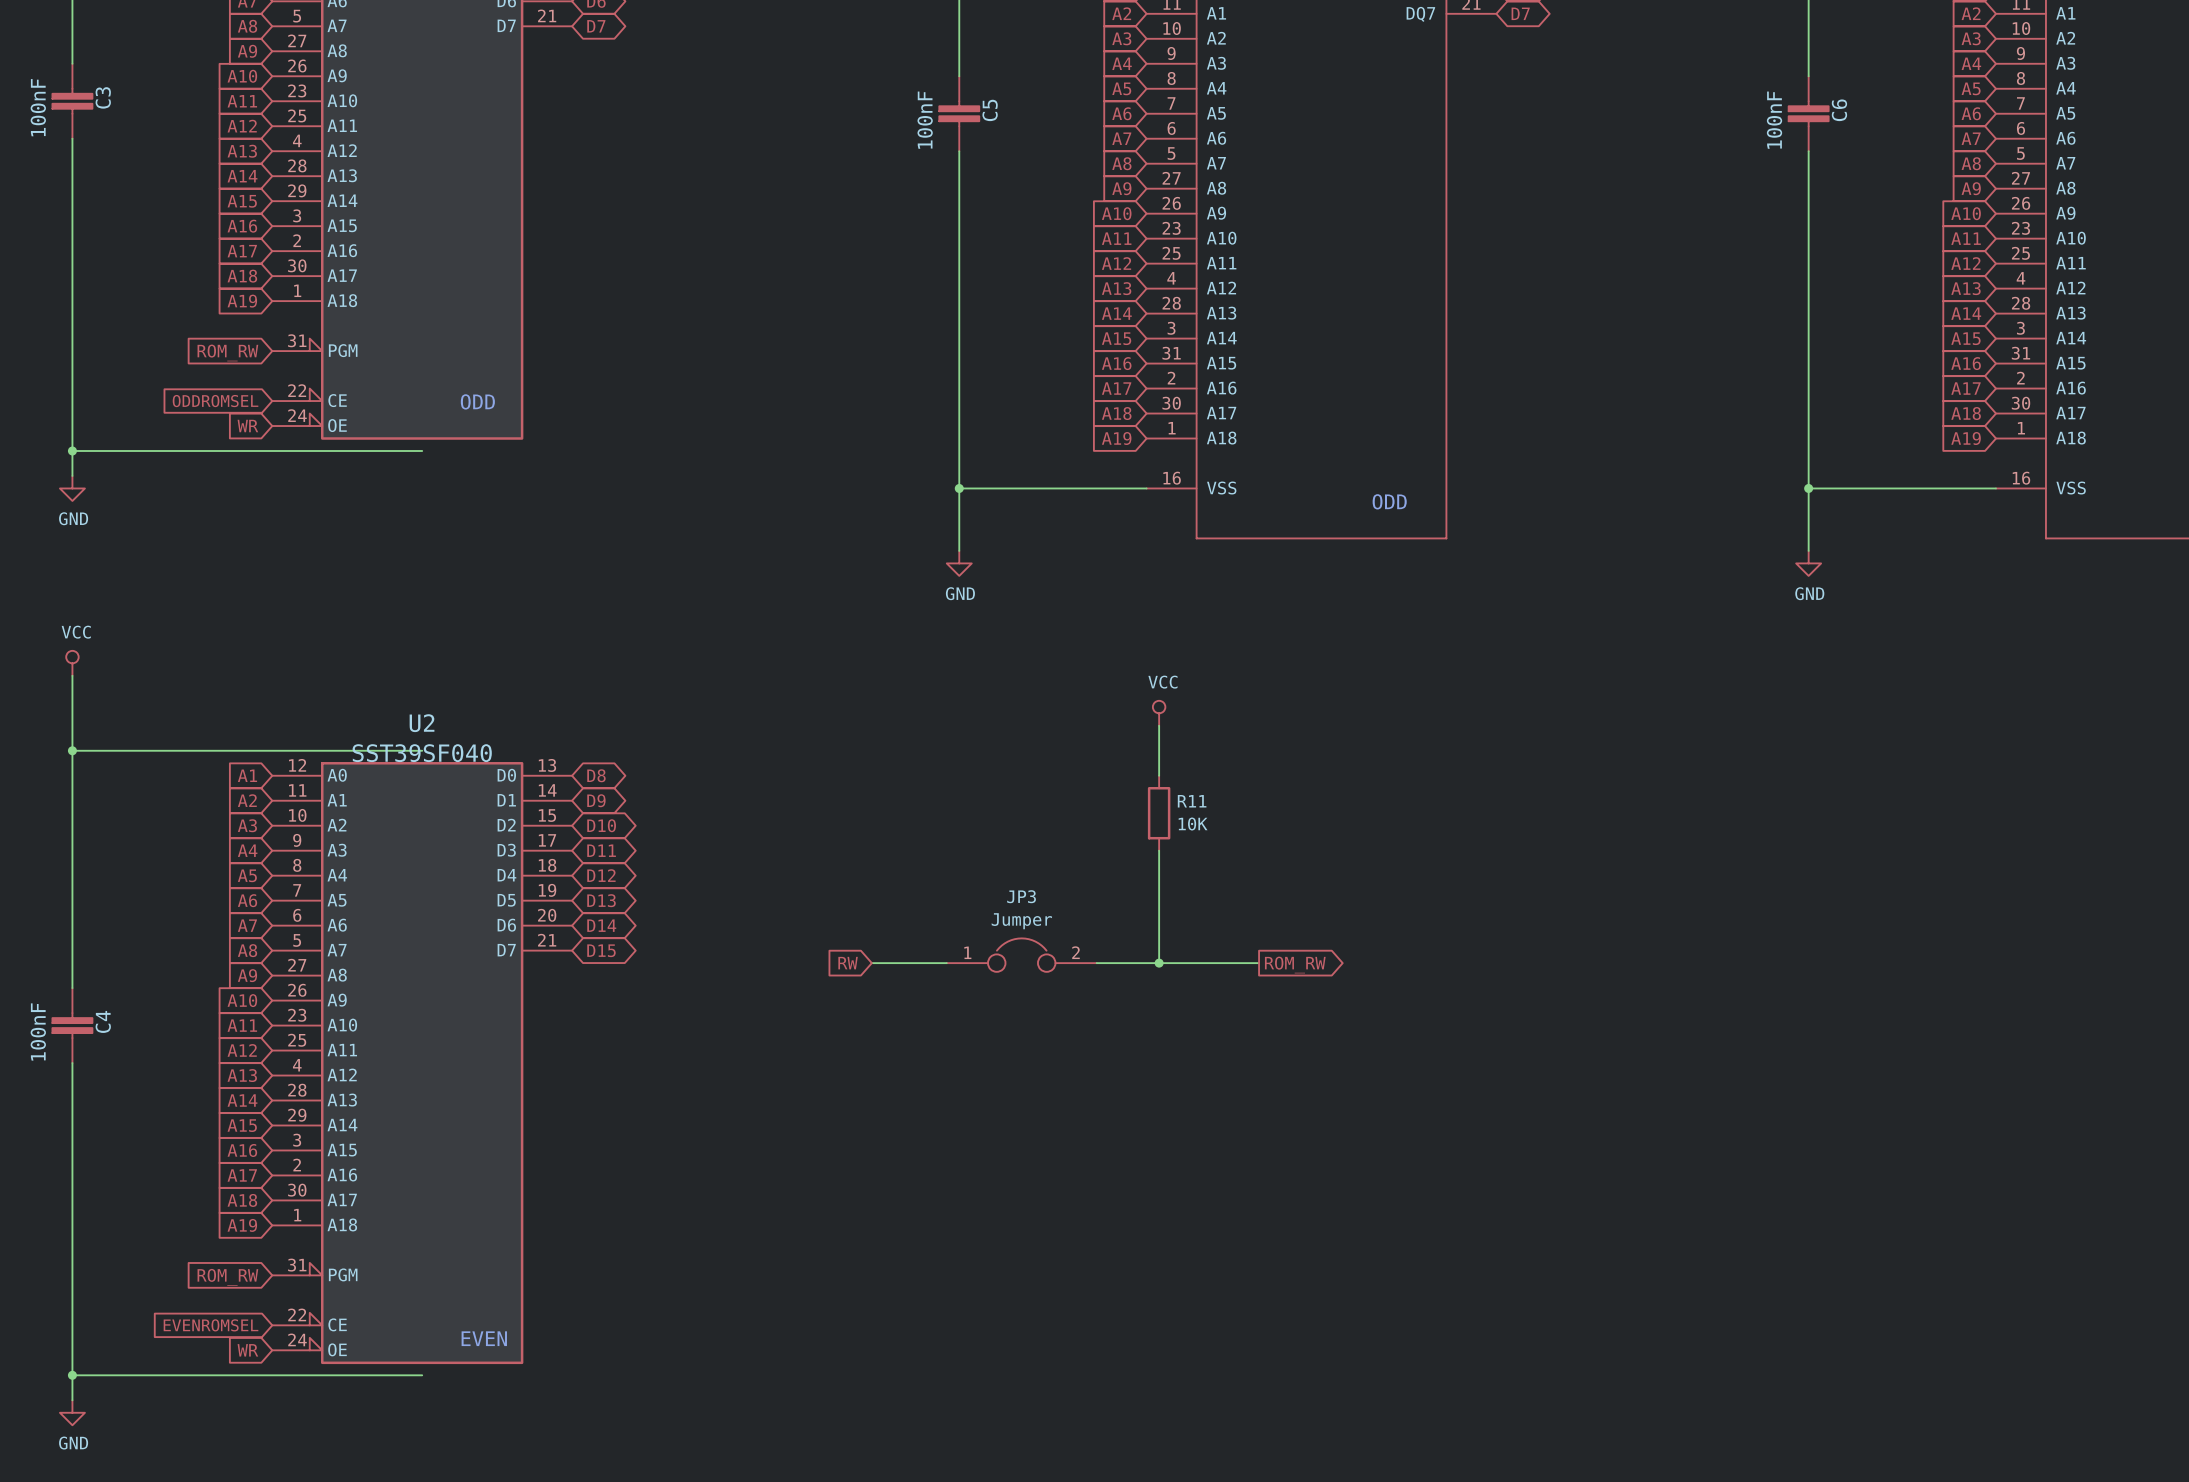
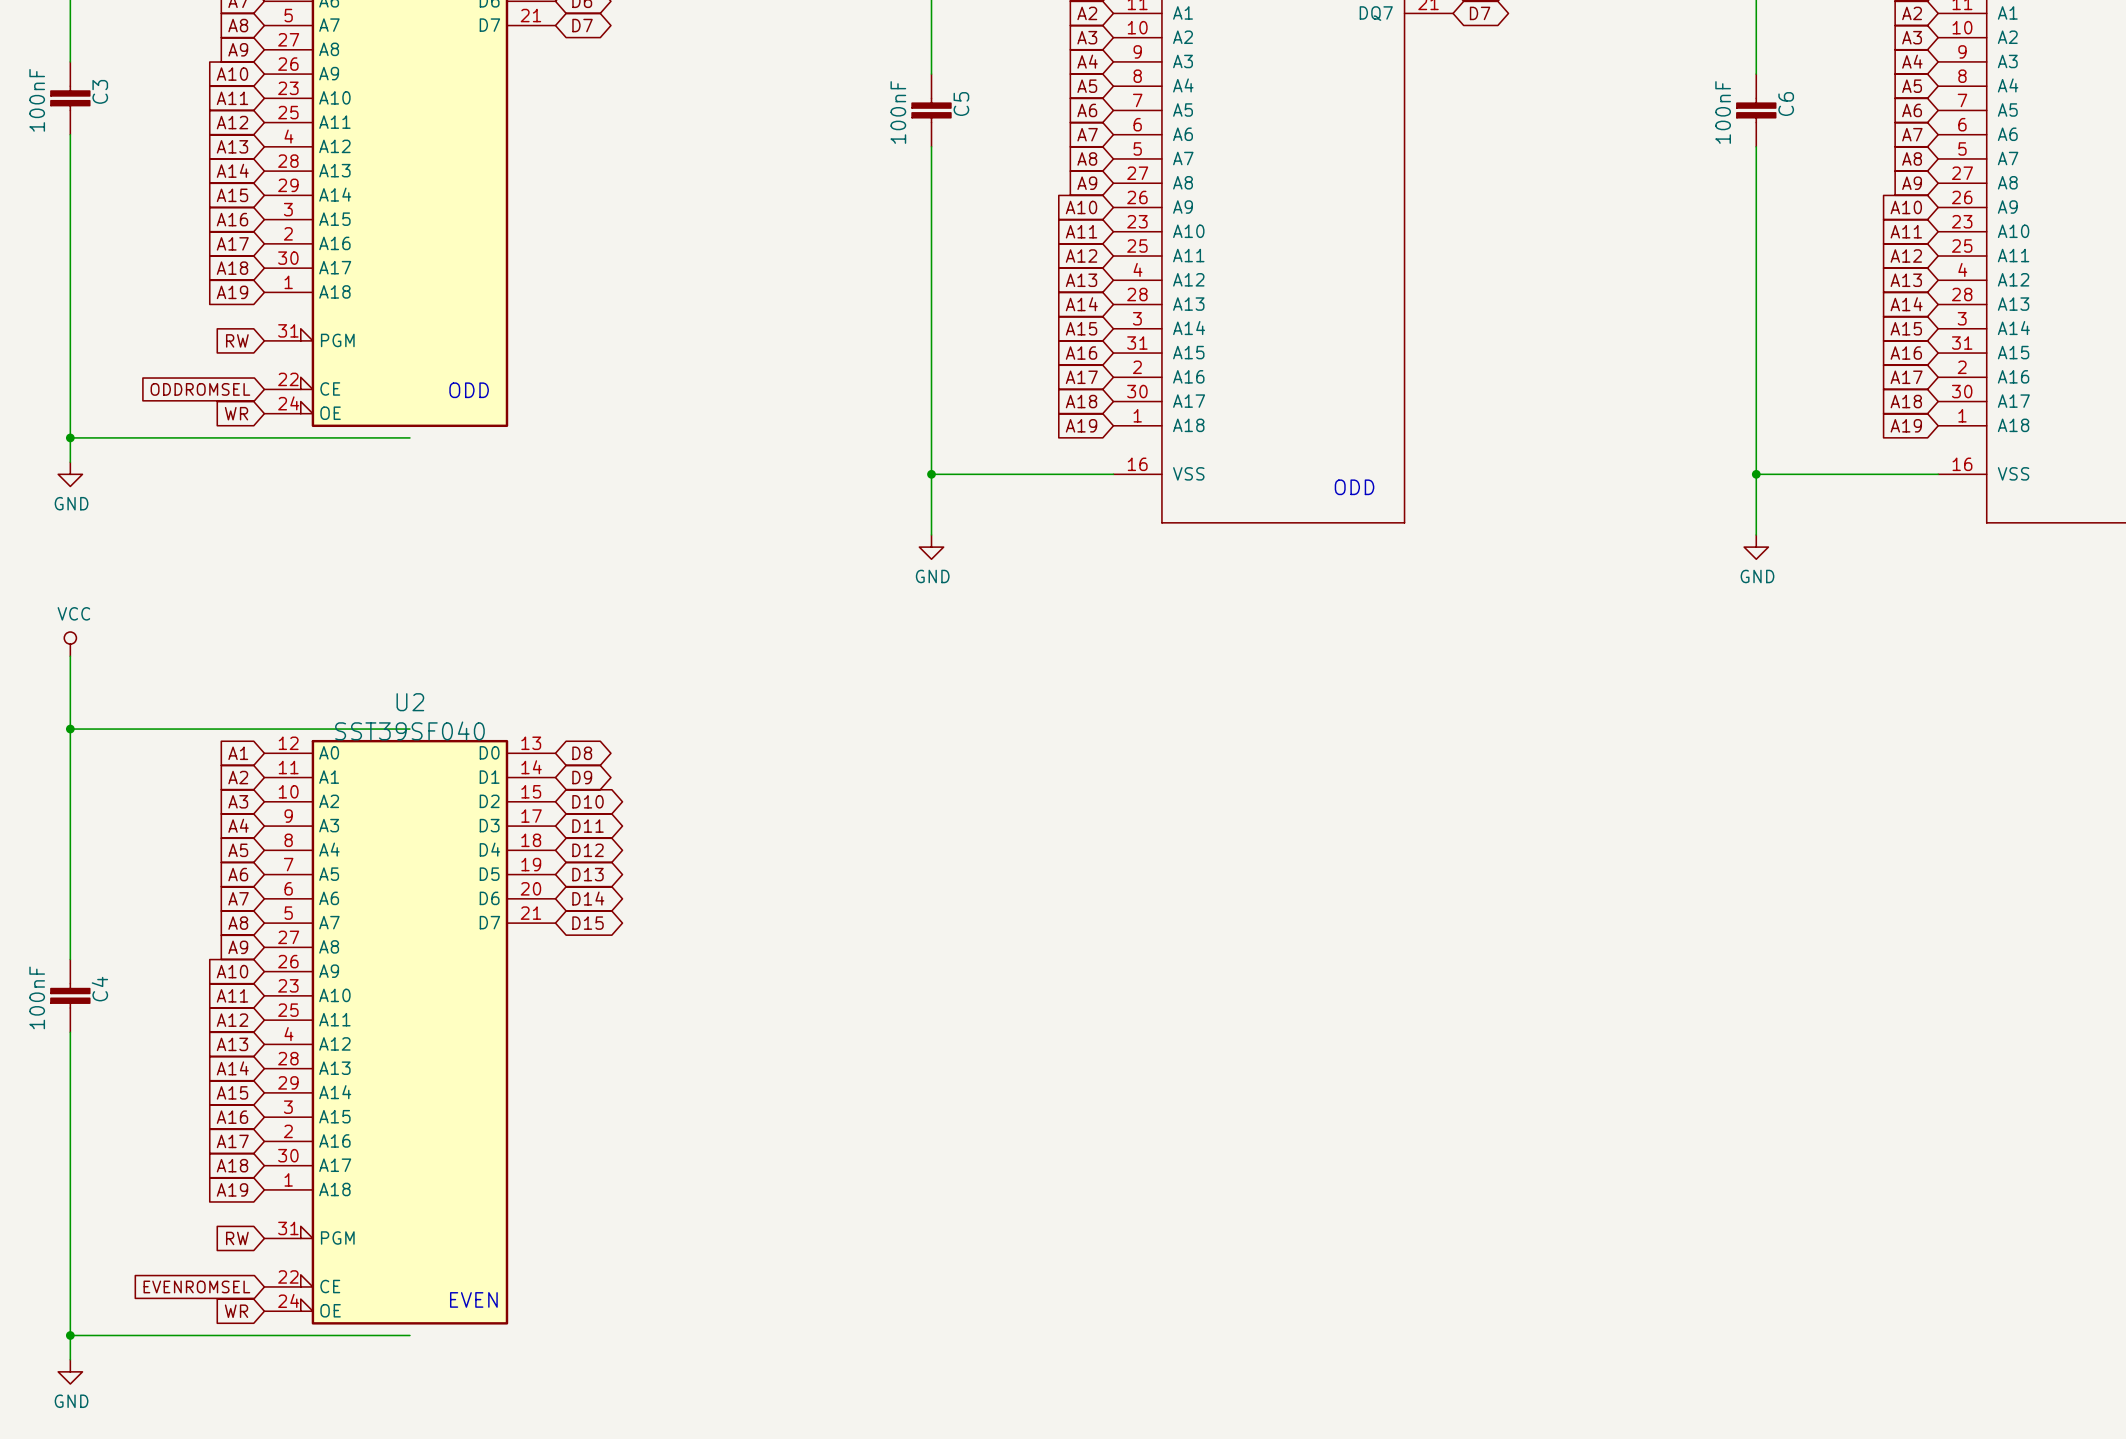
global label: ROM_RW (227, 352) -> RW (237, 340)
power symbol: VCC (1159, 713) -> none
wire: (1159, 725) (1159, 775) -> none
R11: 10K (1159, 813) -> none
wire: (1159, 850) (1159, 963) -> none
JP3: Jumper (1021, 955) -> none
global label: RW (848, 963) -> none
wire: (871, 963) (946, 963) -> none
wire: (1096, 963) (1259, 963) -> none
junction: (1159, 963) -> none
global label: ROM_RW (1295, 965) -> none
global label: ROM_RW (227, 1277) -> RW (237, 1238)

